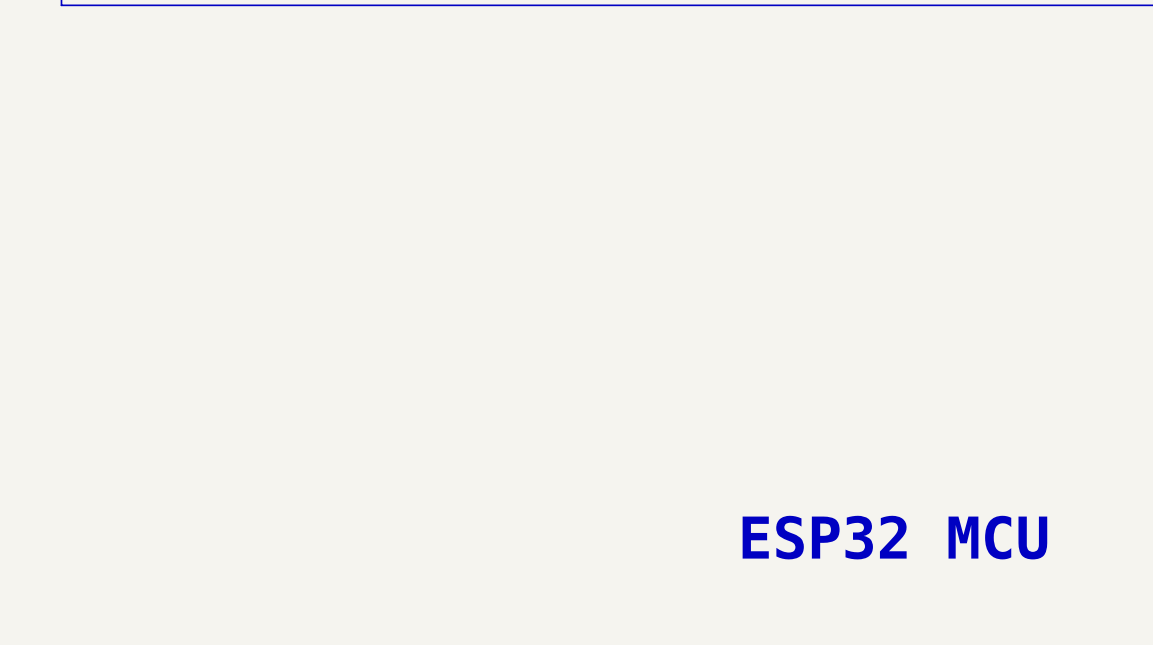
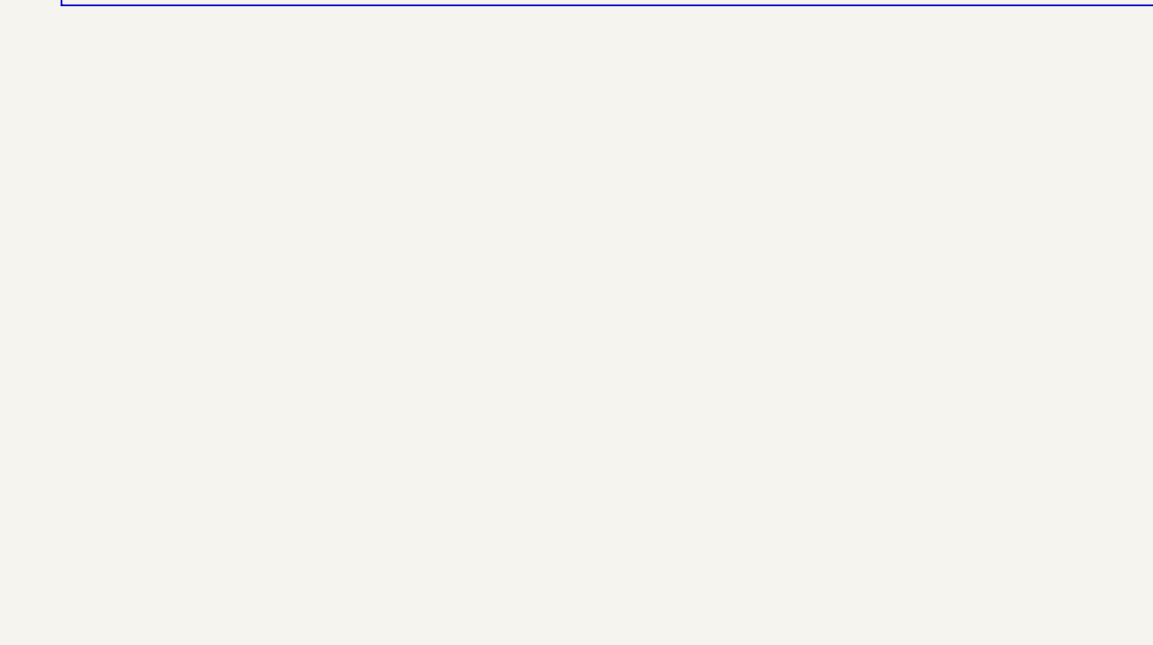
text: ESP32 MCU (894, 537) -> none

